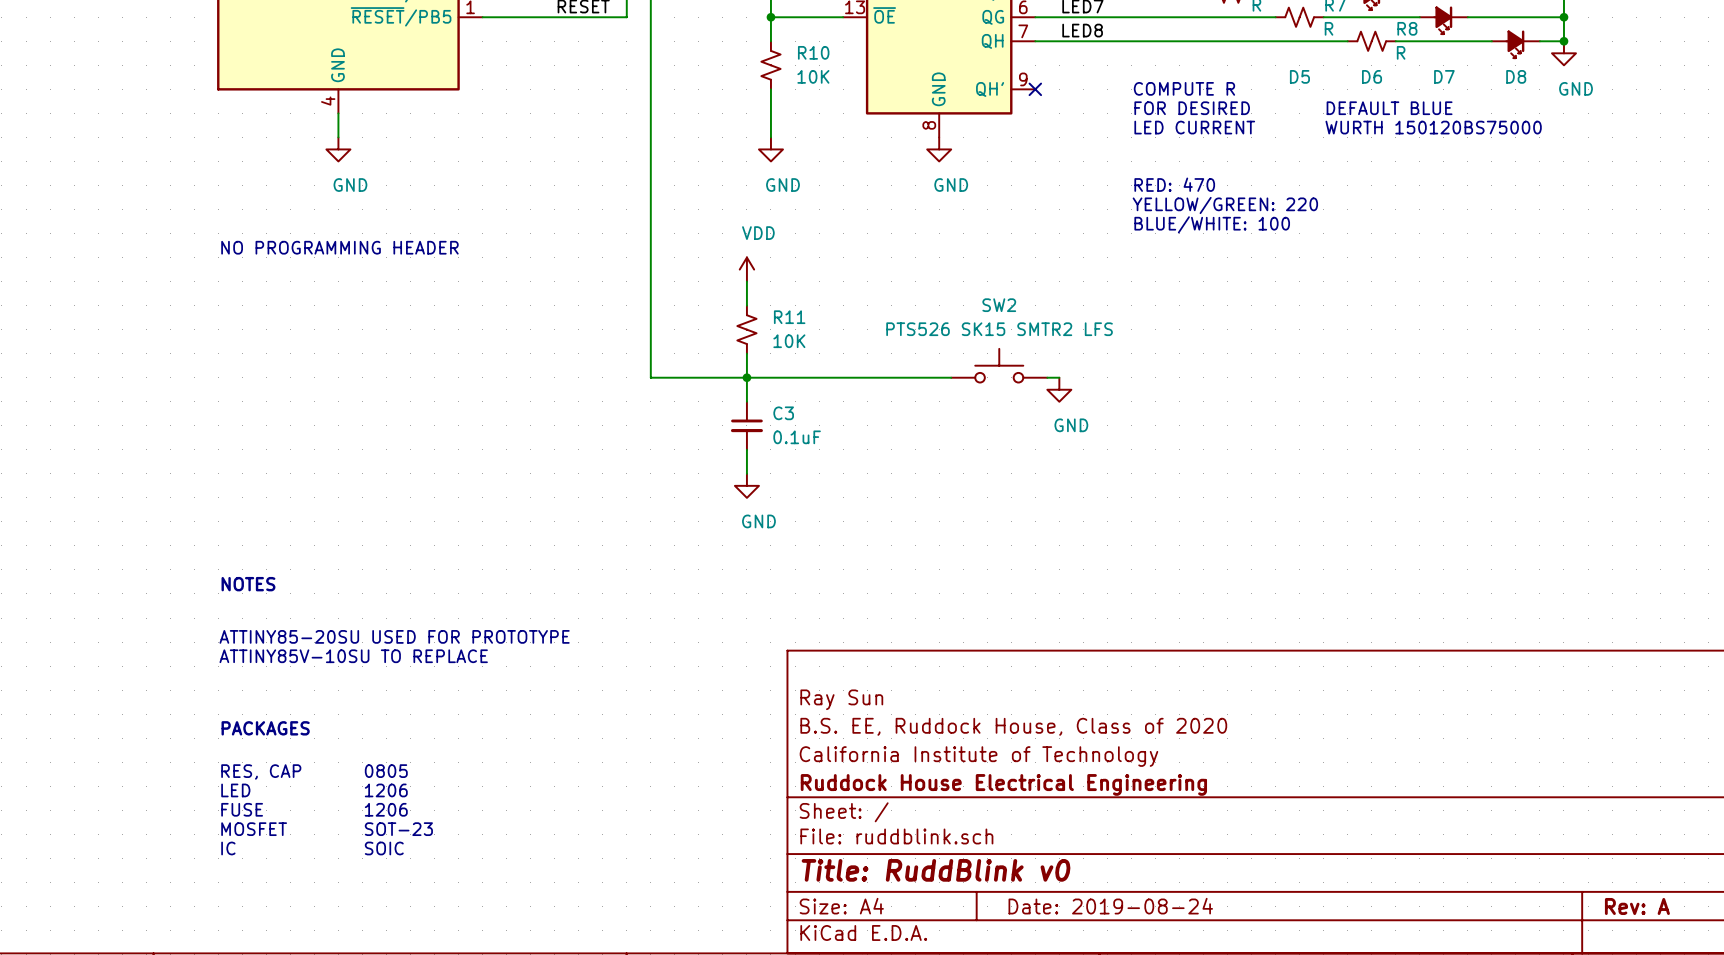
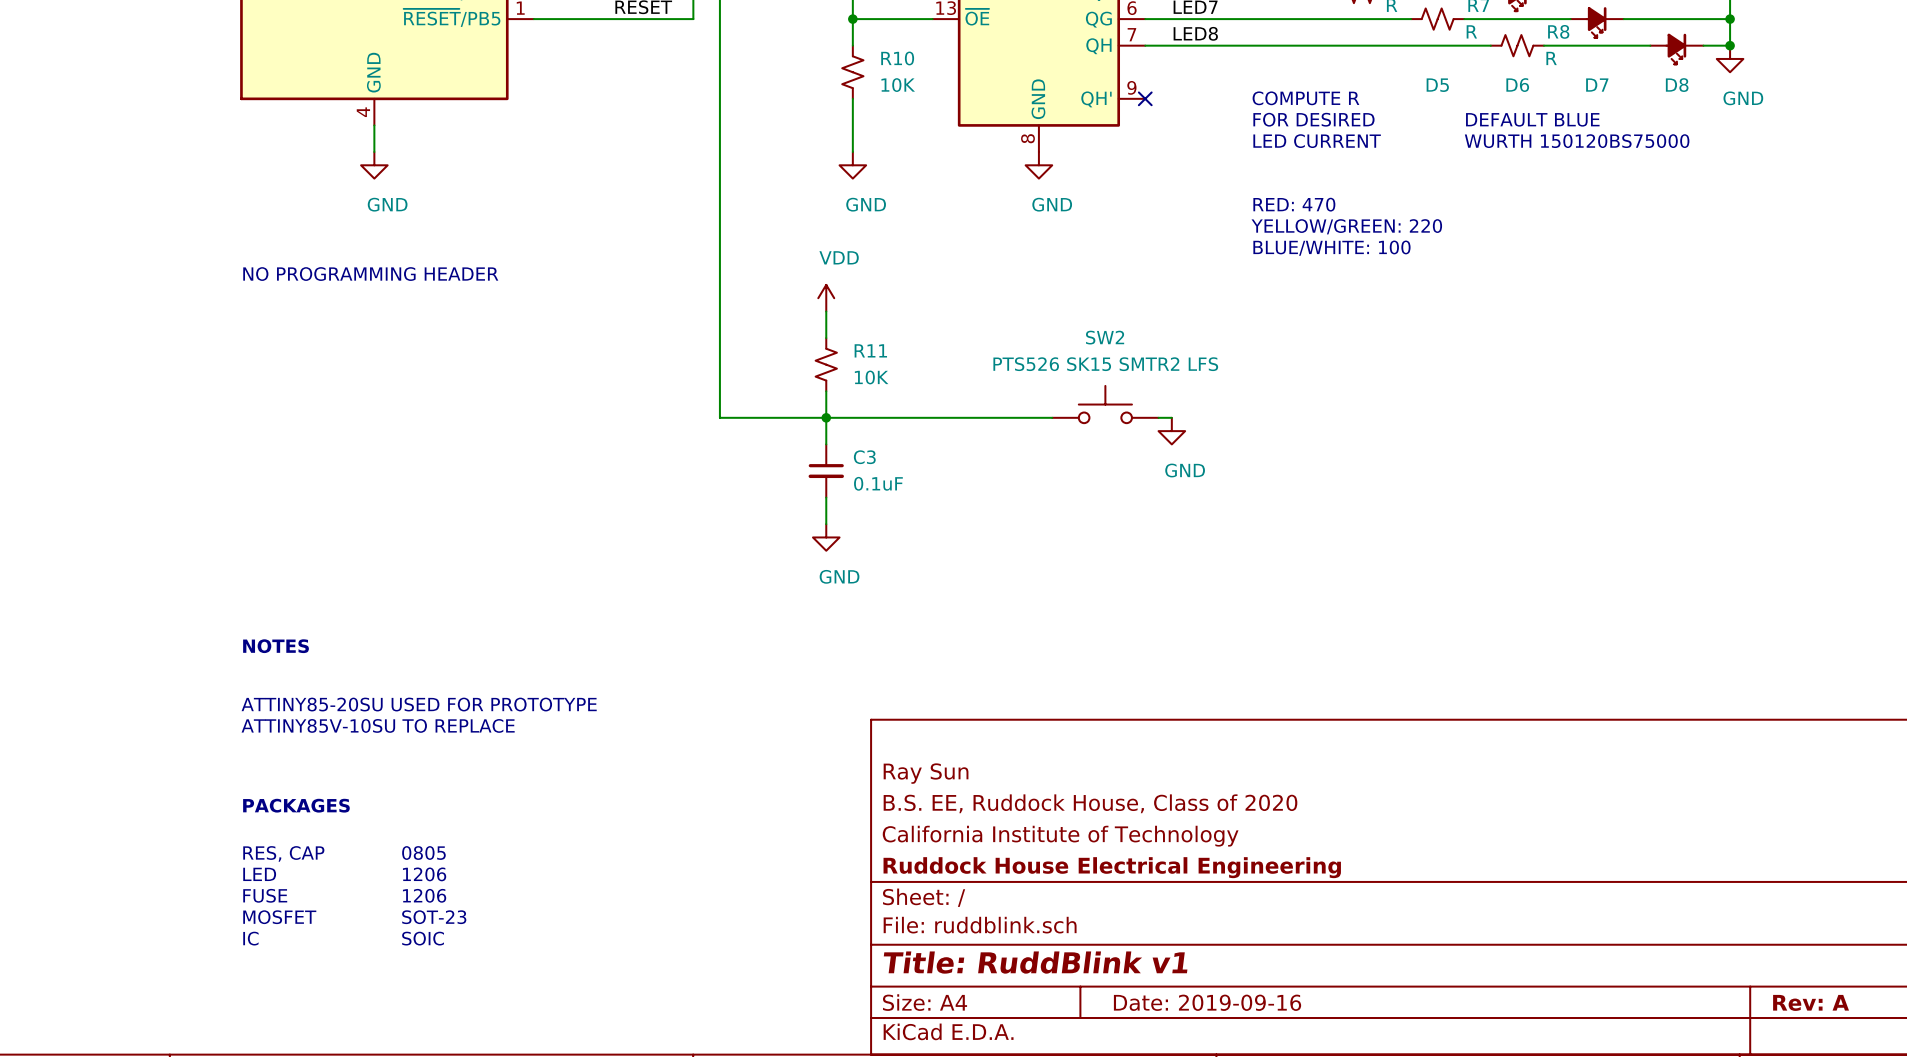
title block: Title: RuddBlink v0 (936, 870) -> Title: RuddBlink v1 (1035, 962)
title block: Date: 2019-08-24 (1110, 906) -> Date: 2019-09-16 (1207, 1002)

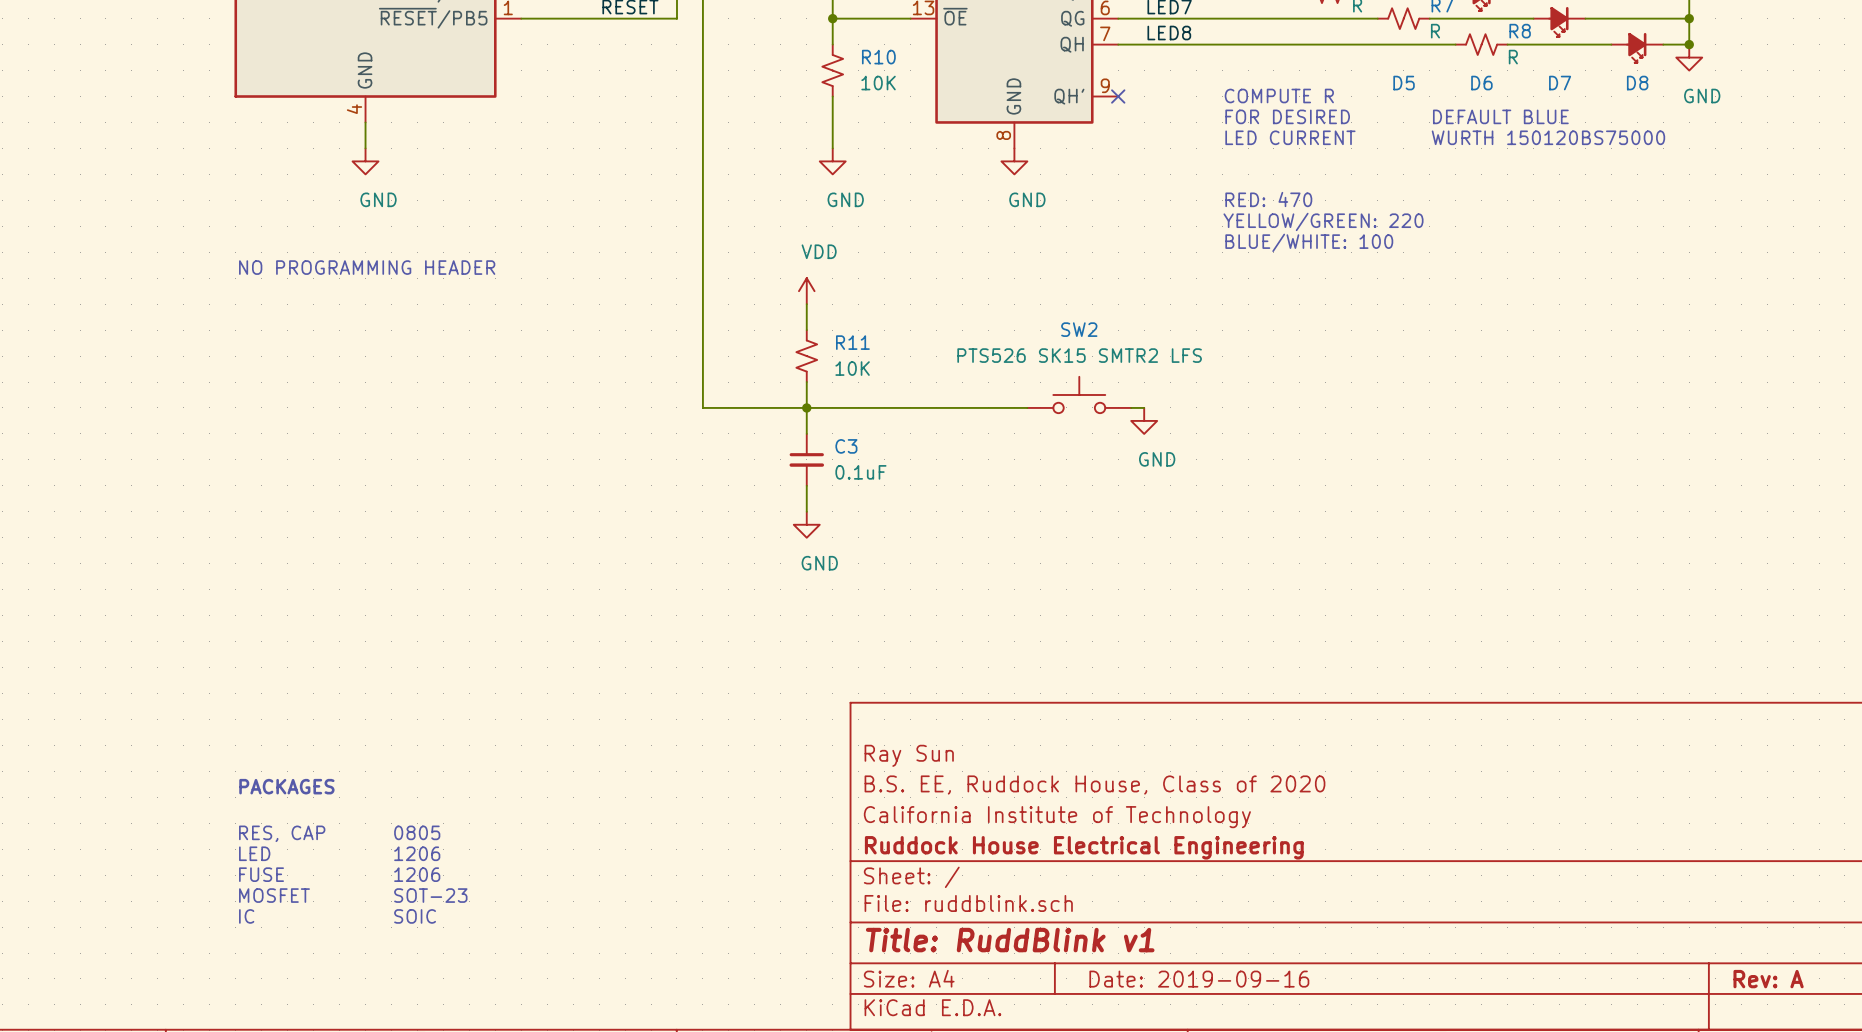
text: NOTES (276, 646) -> none
text: ATTINY85-20SU USED FOR PROTOTYPE (419, 704) -> none
text: ATTINY85V-10SU TO REPLACE (378, 725) -> none

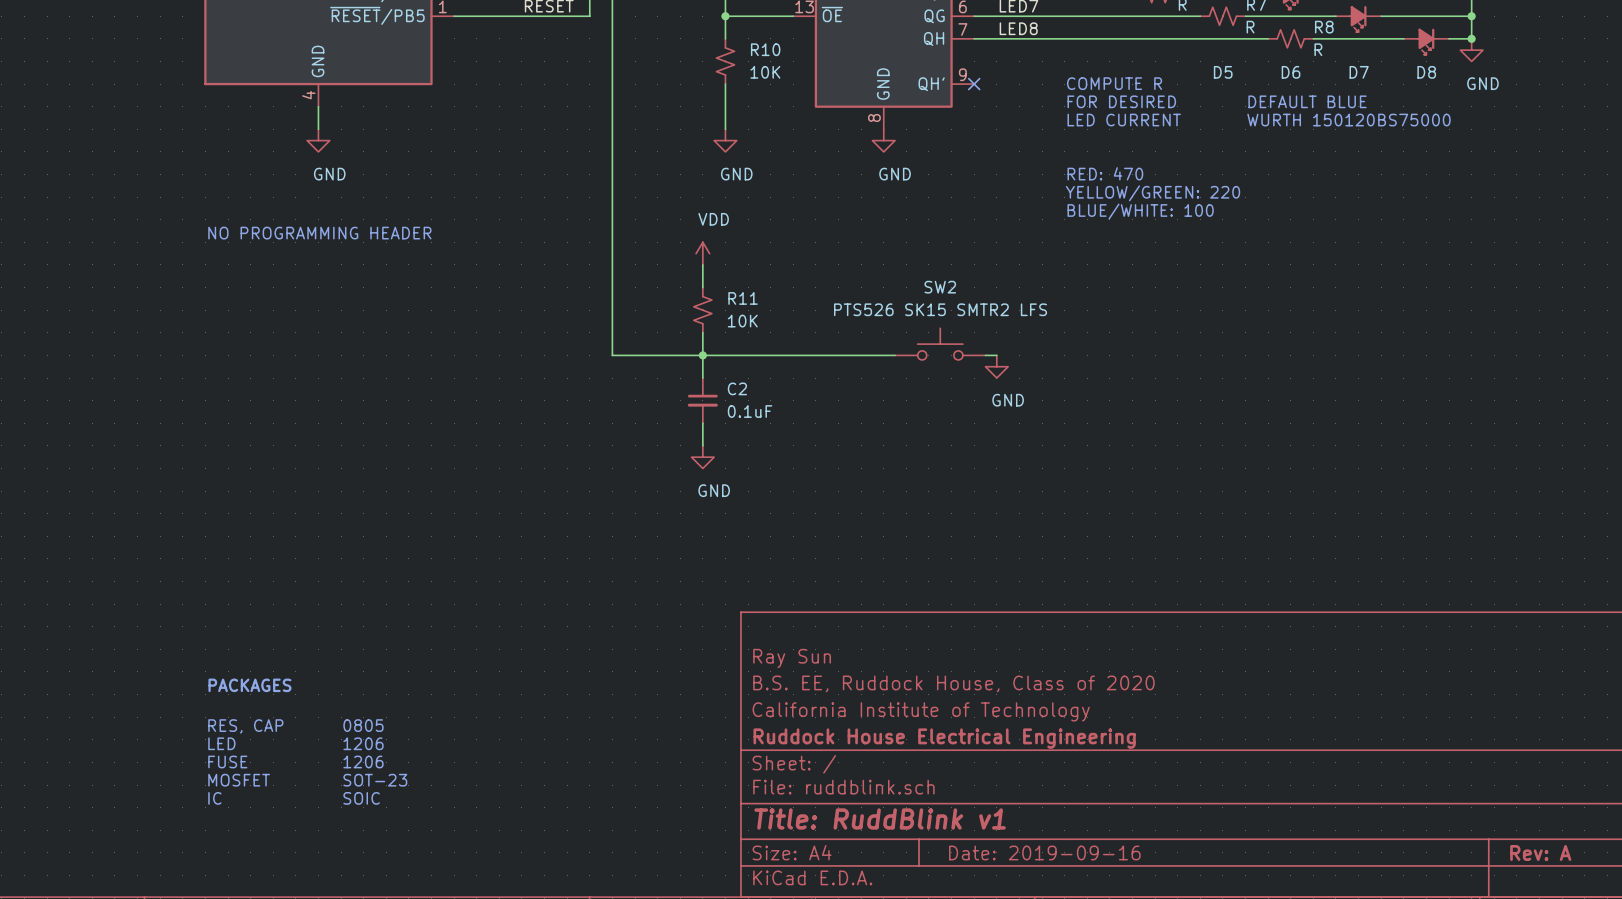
C3 name: C3 (846, 446) -> C2 (737, 388)

